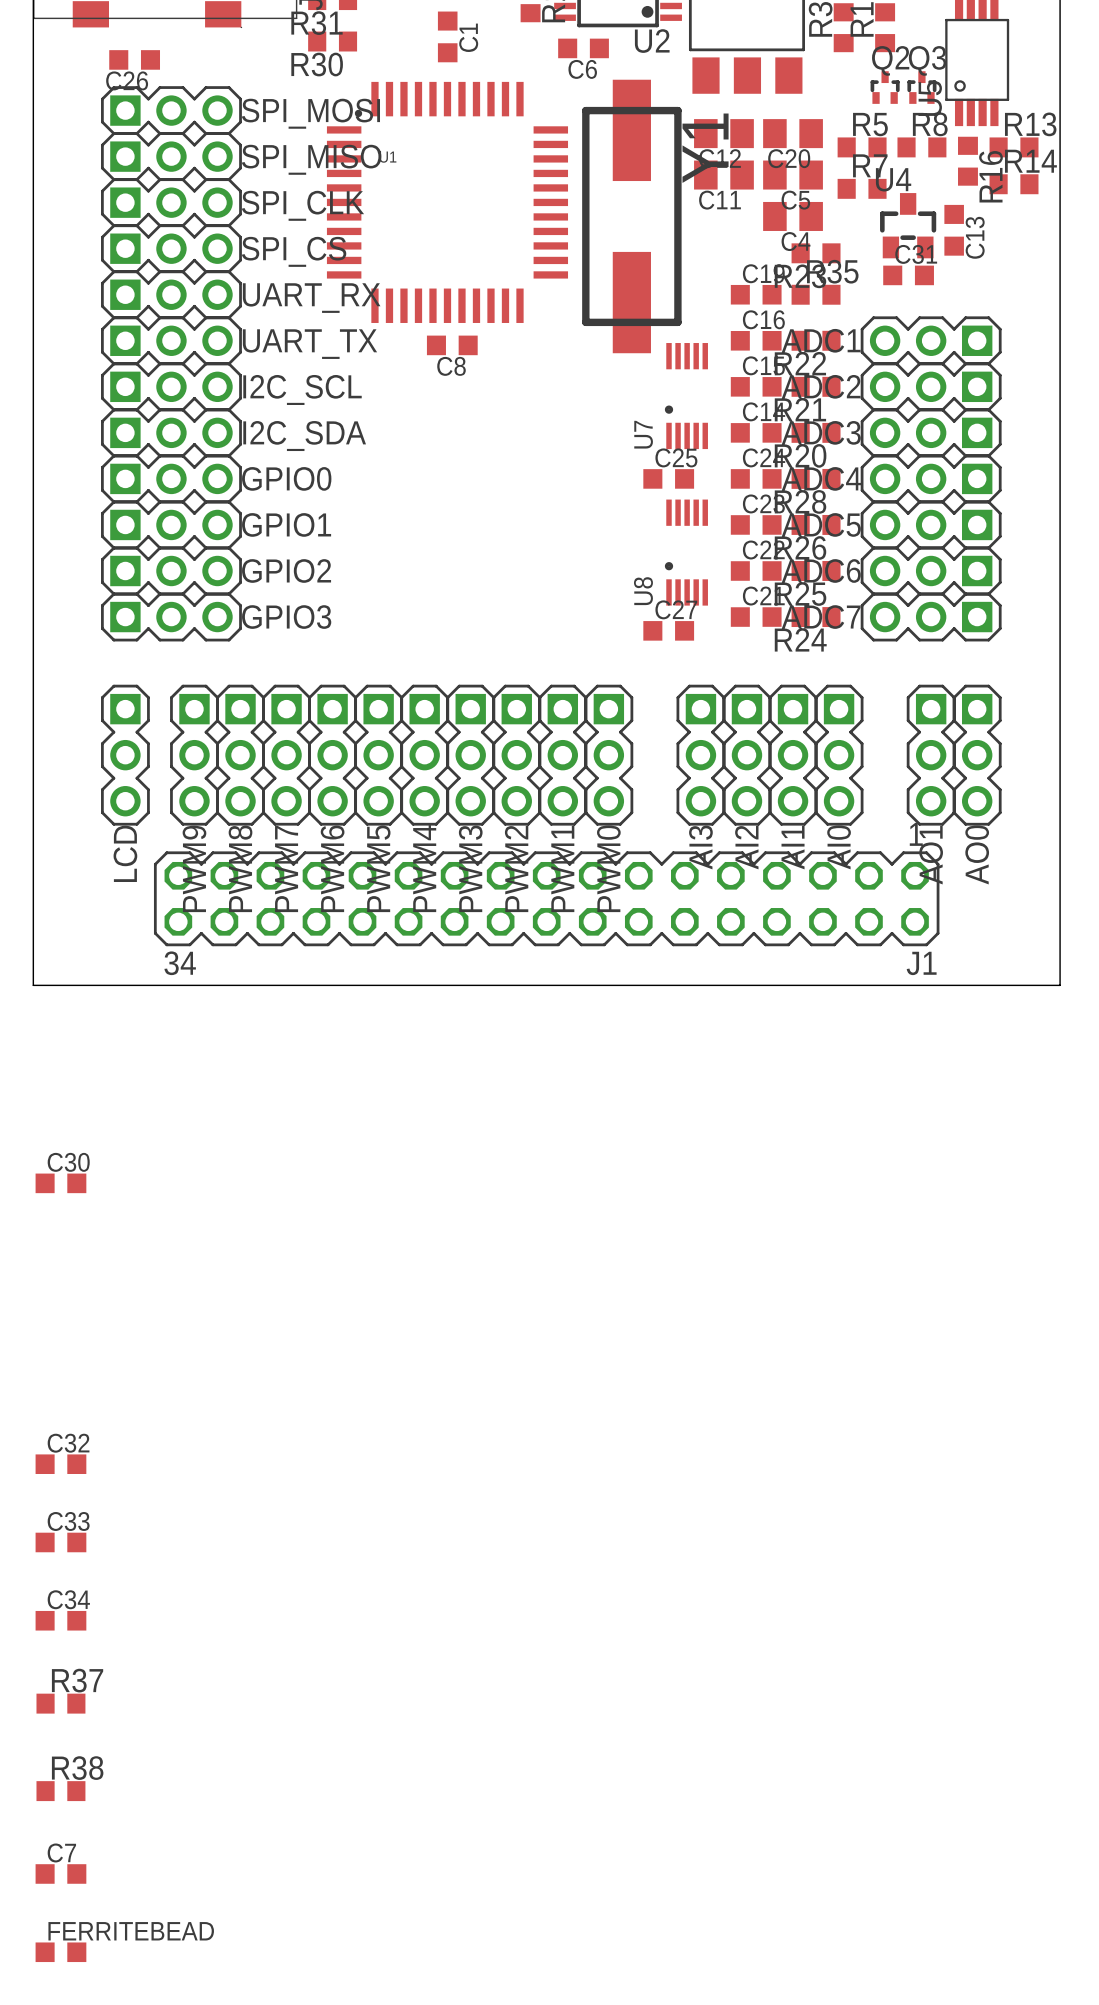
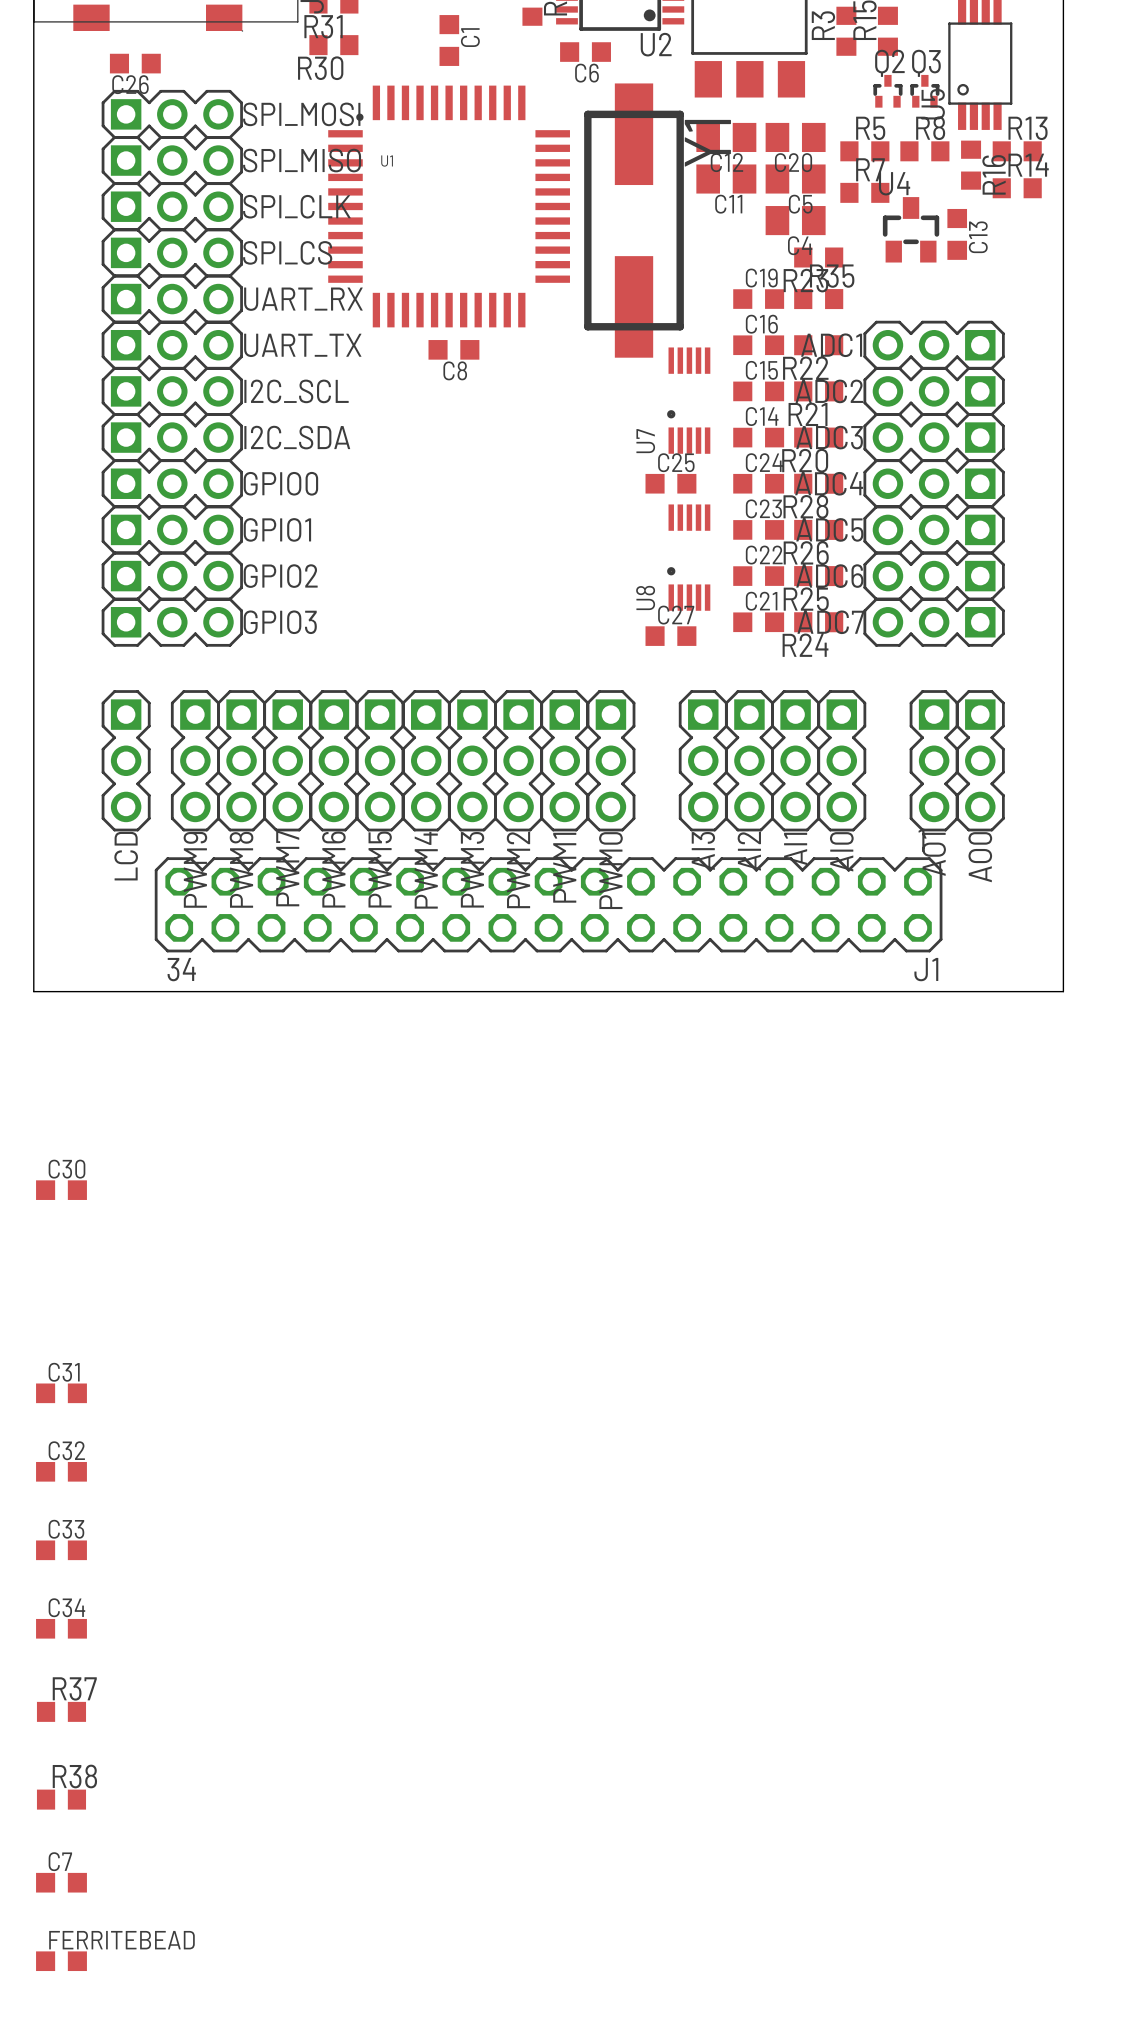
C31 position: (908, 275) -> (61, 1393)

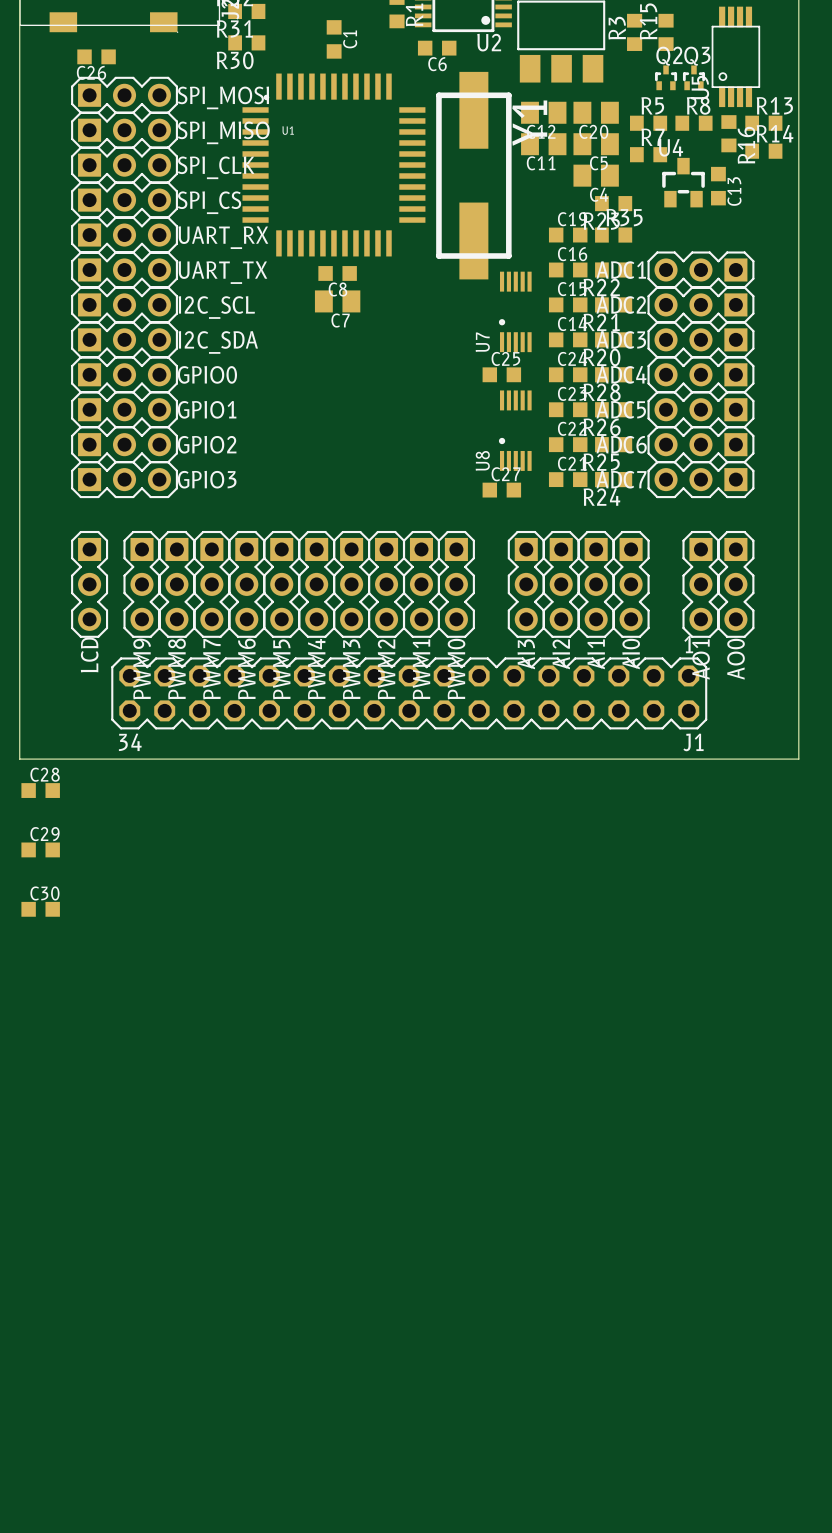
C28: none -> (40, 790)
C29: none -> (40, 849)
C31: (61, 1393) -> none
C32: (61, 1471) -> none
C33: (61, 1550) -> none
C34: (61, 1628) -> none
R37: (61, 1711) -> none
R38: (61, 1799) -> none
C7 name position: C7 (60, 1861) -> C7 (340, 320)
C7 footprint: [36, 1872, 87, 1893] -> [314, 290, 361, 313]
FERRITEBEAD: (61, 1961) -> none

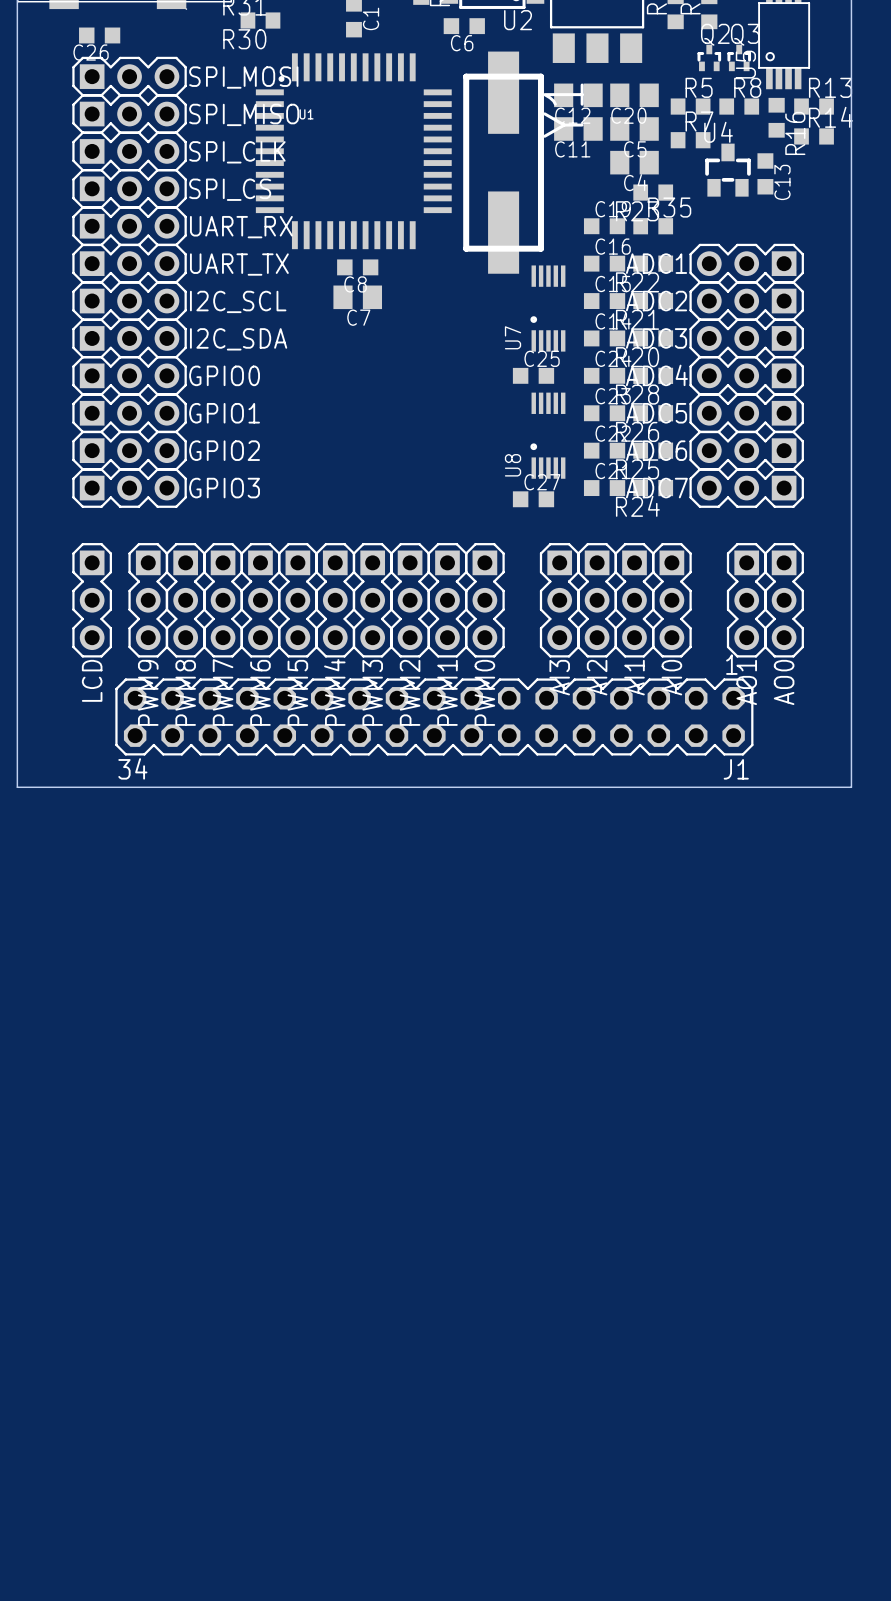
C28: (40, 790) -> none
C29: (40, 849) -> none
C30: (40, 909) -> none

